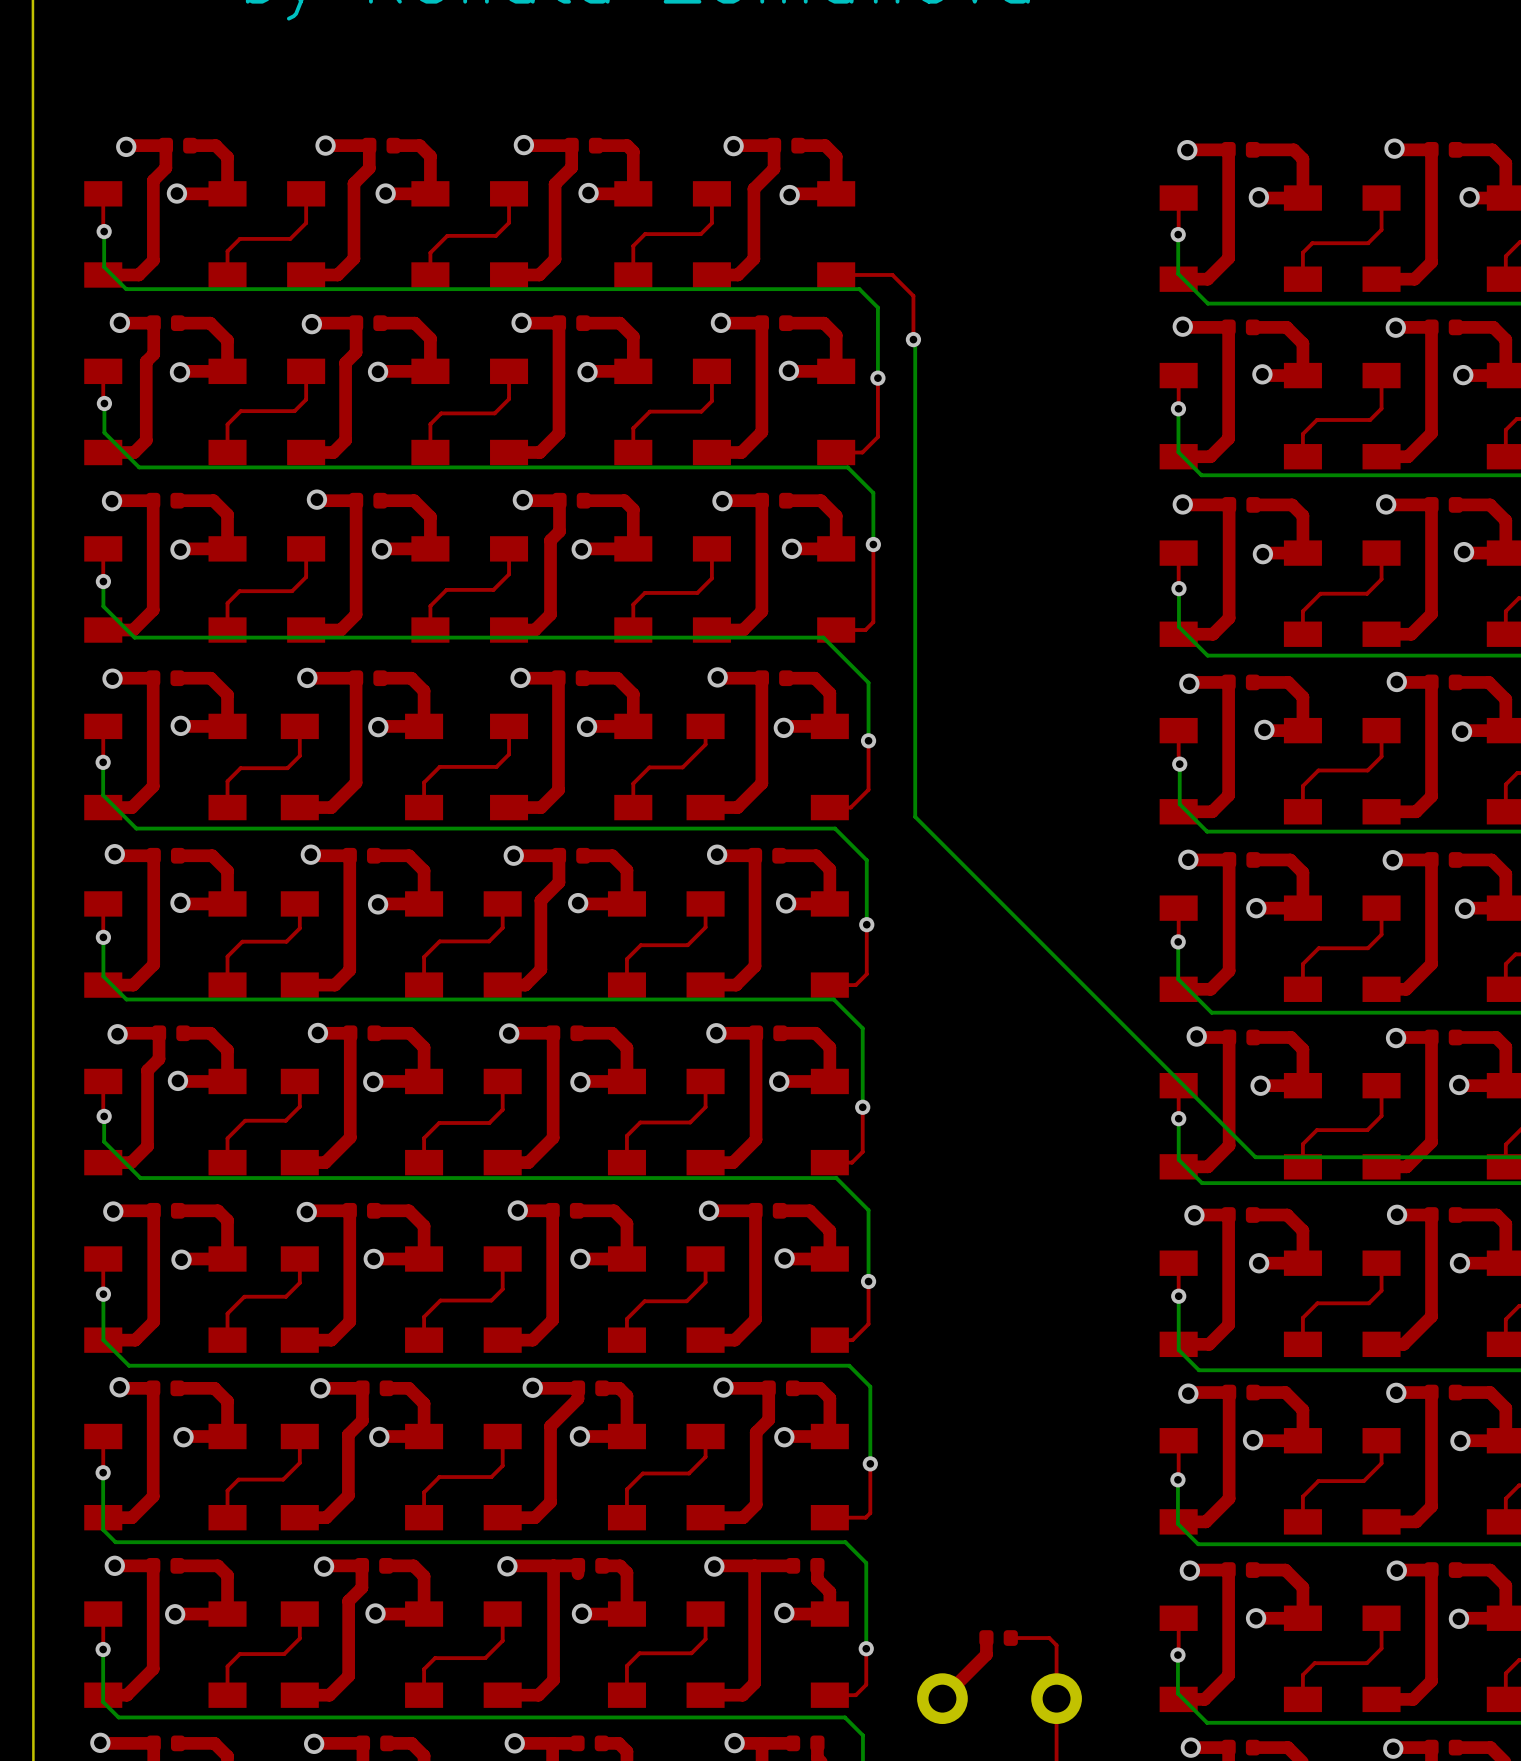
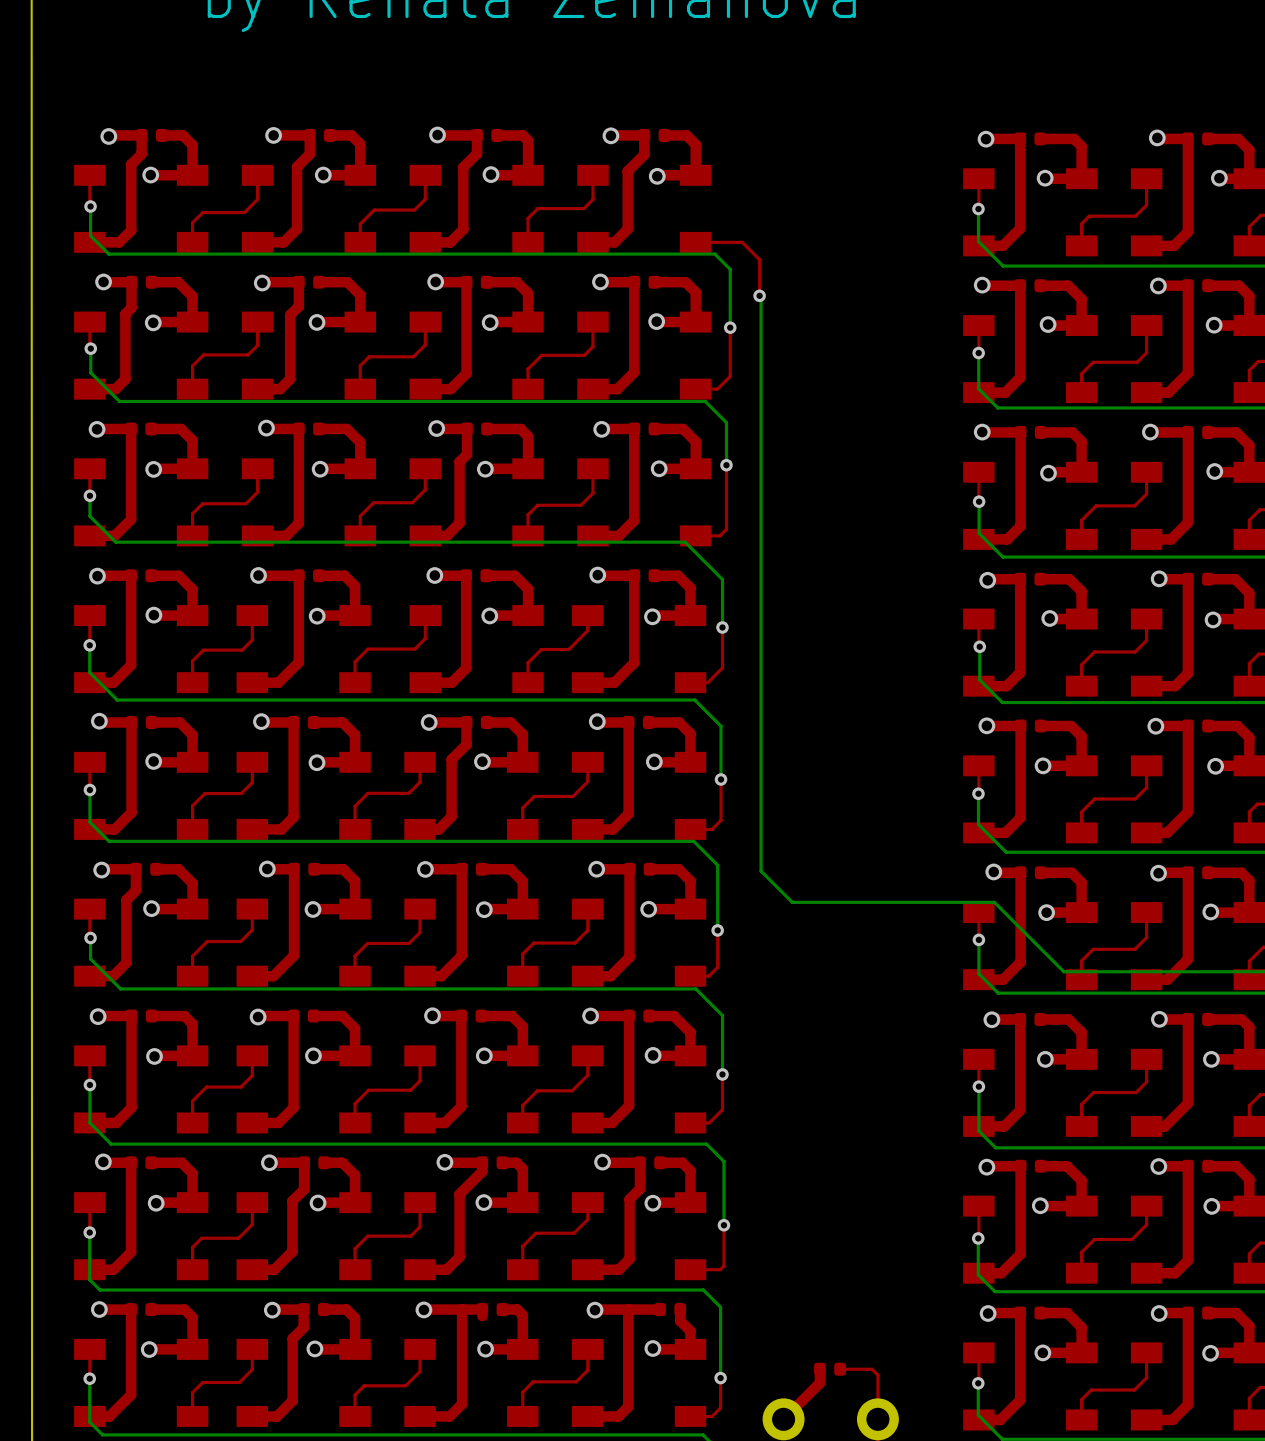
bottom track: (915, 816) (1255, 1157) (1281, 1157) -> (761, 690) (761, 871) (792, 902) (994, 902) (1063, 971)

